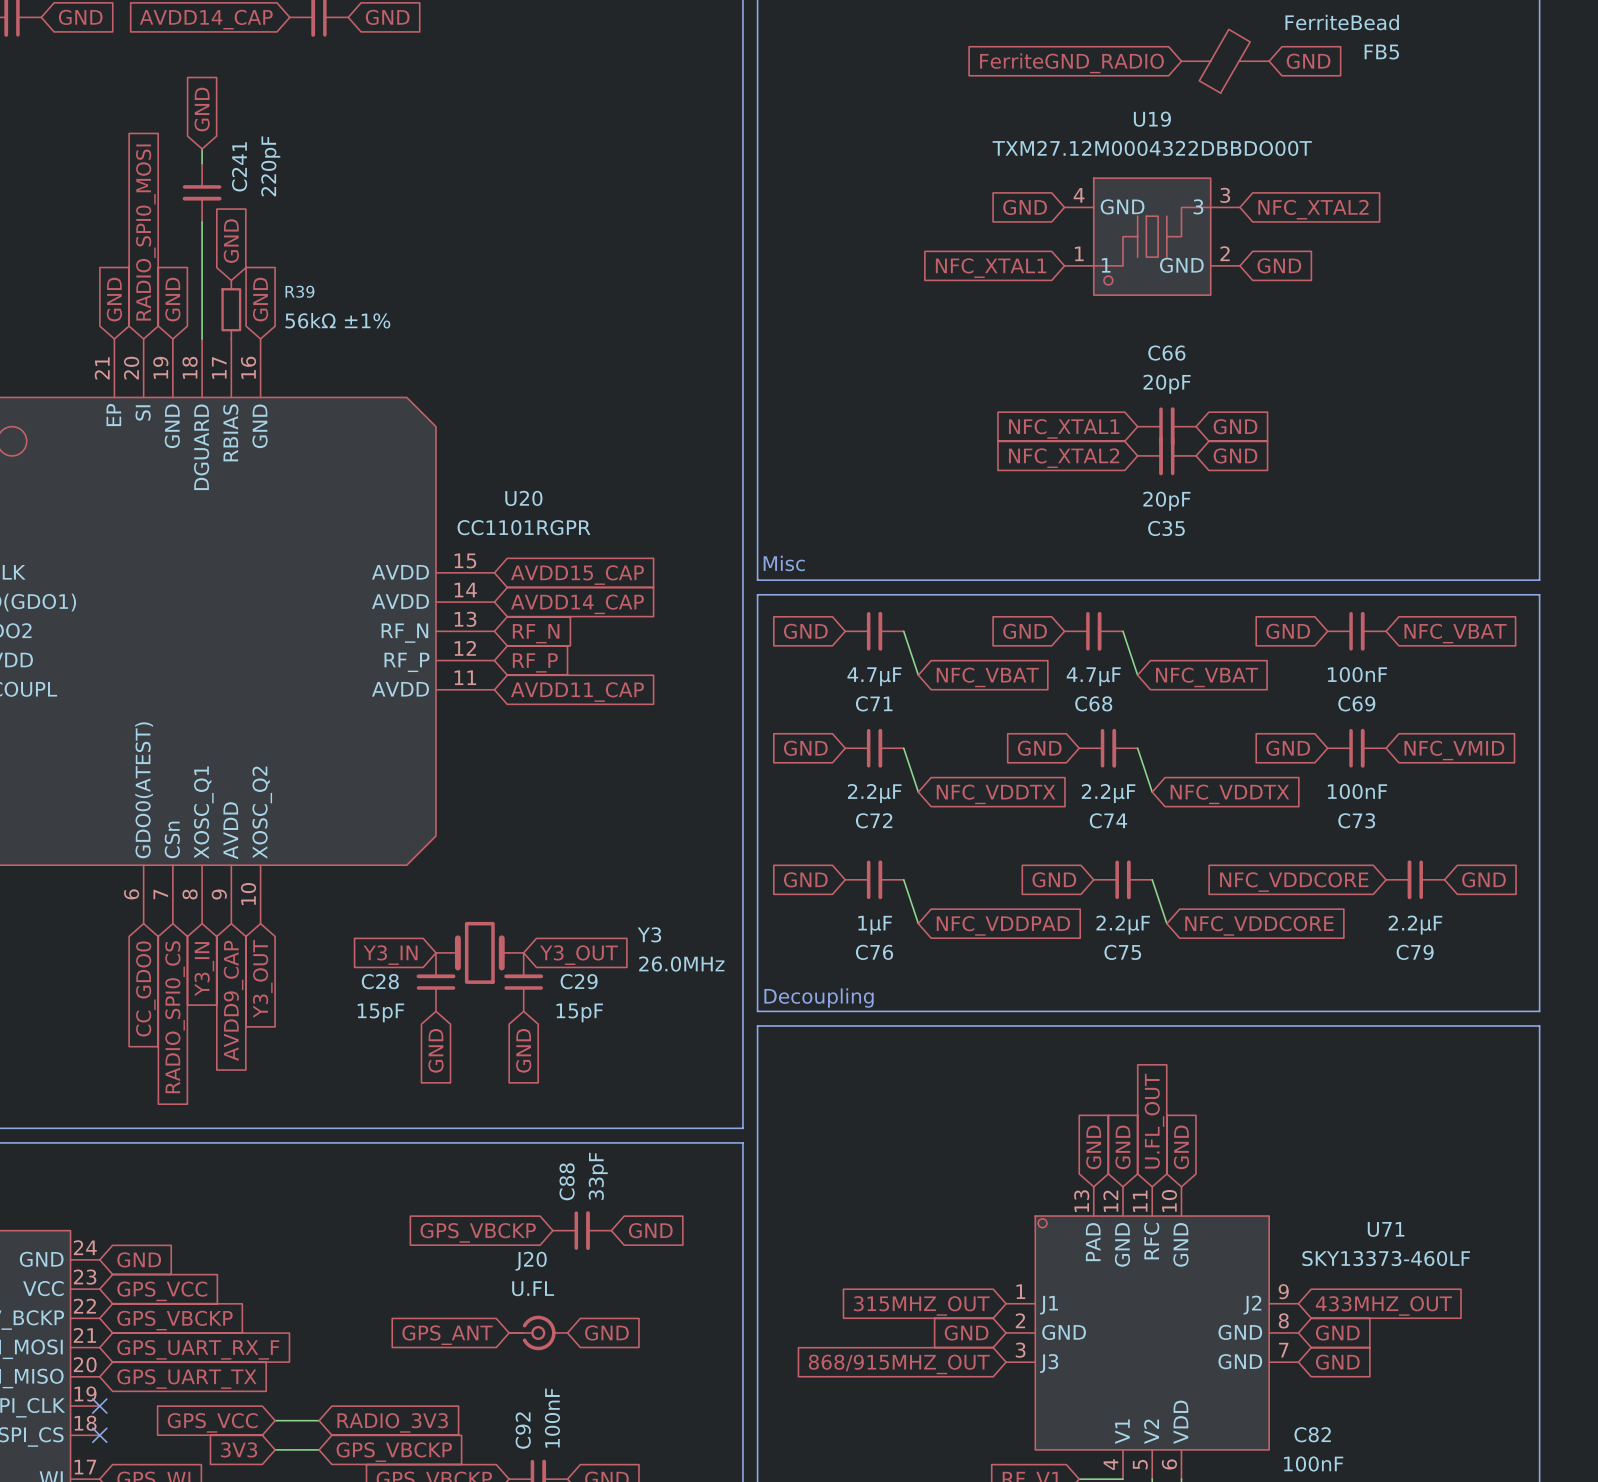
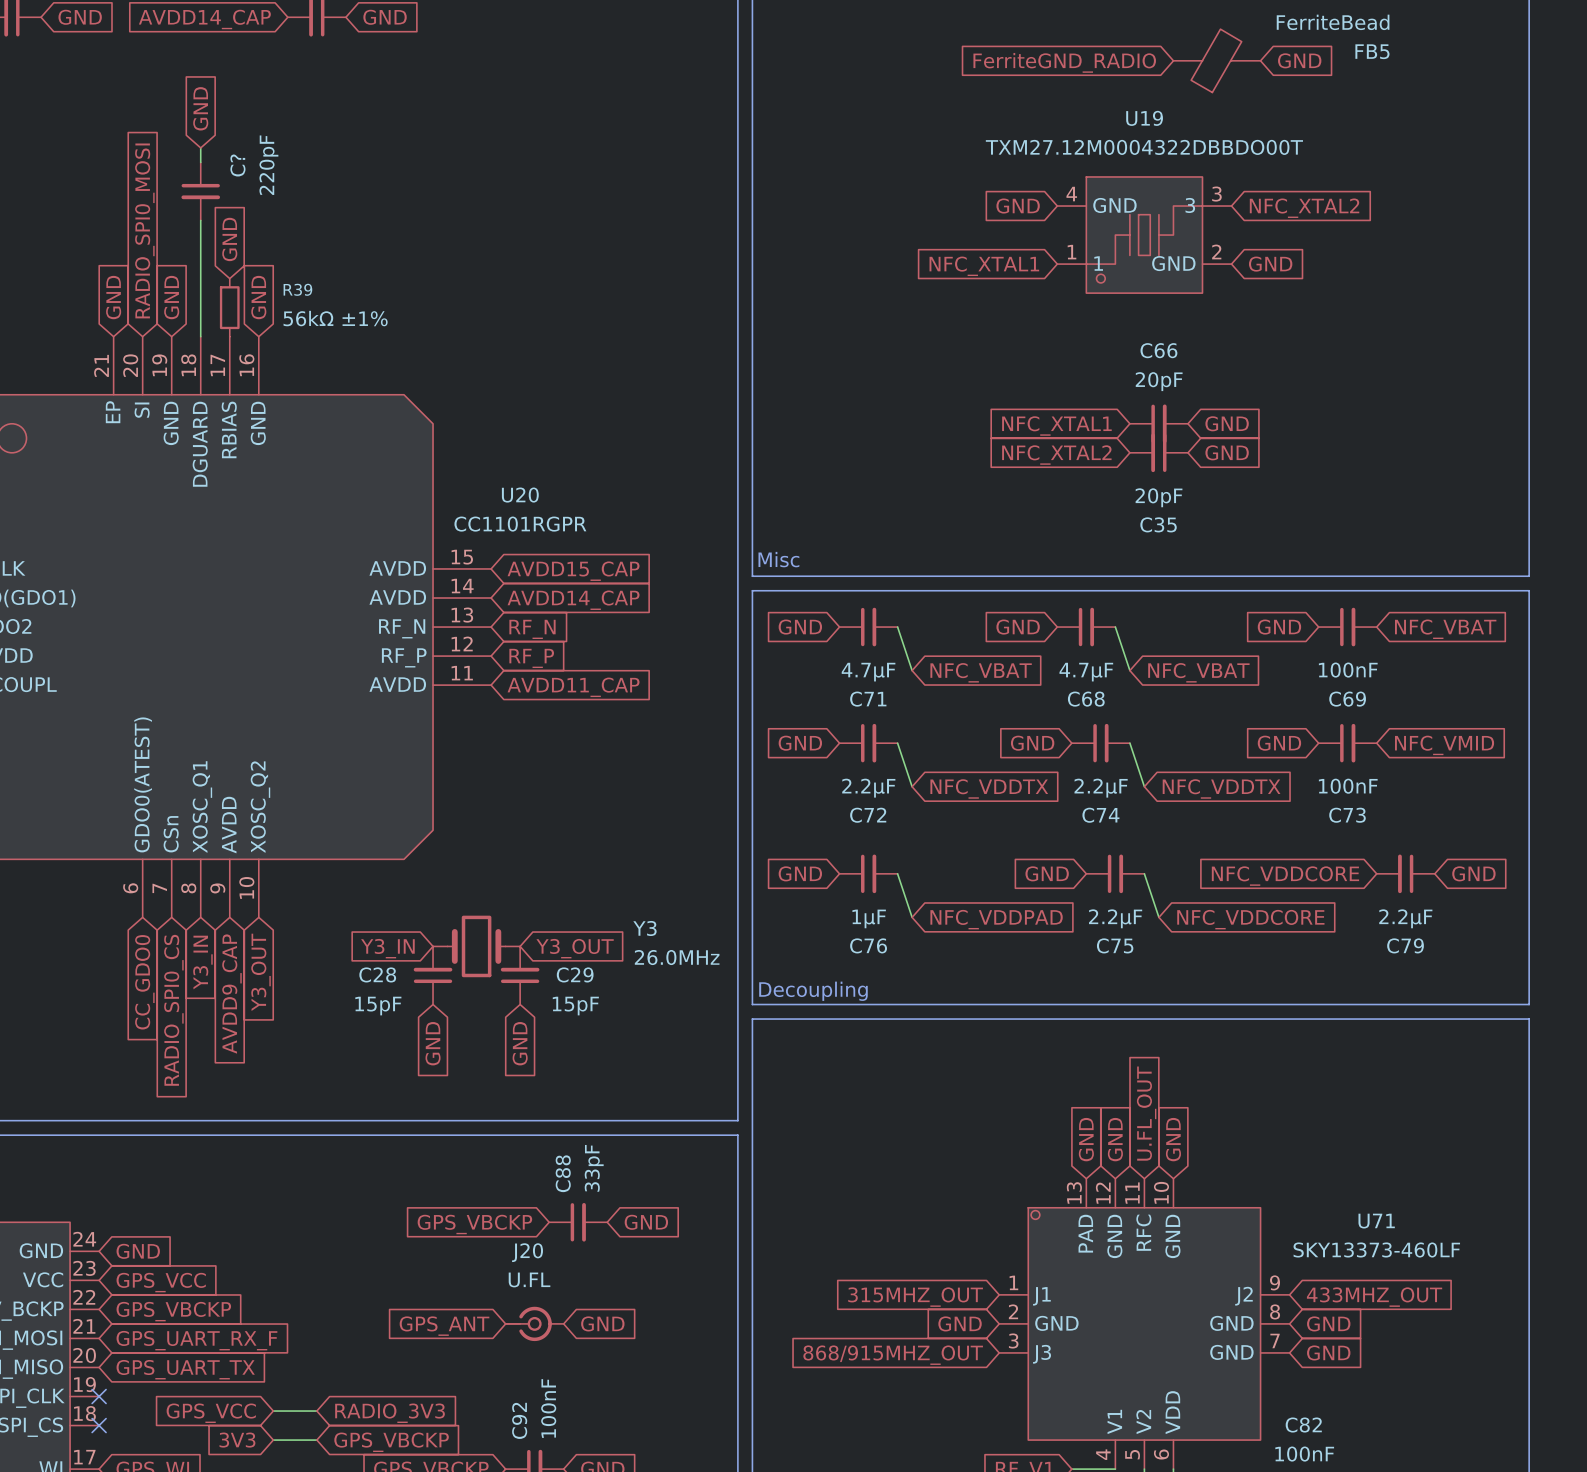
C241 name: C241 (239, 166) -> C? (237, 165)

